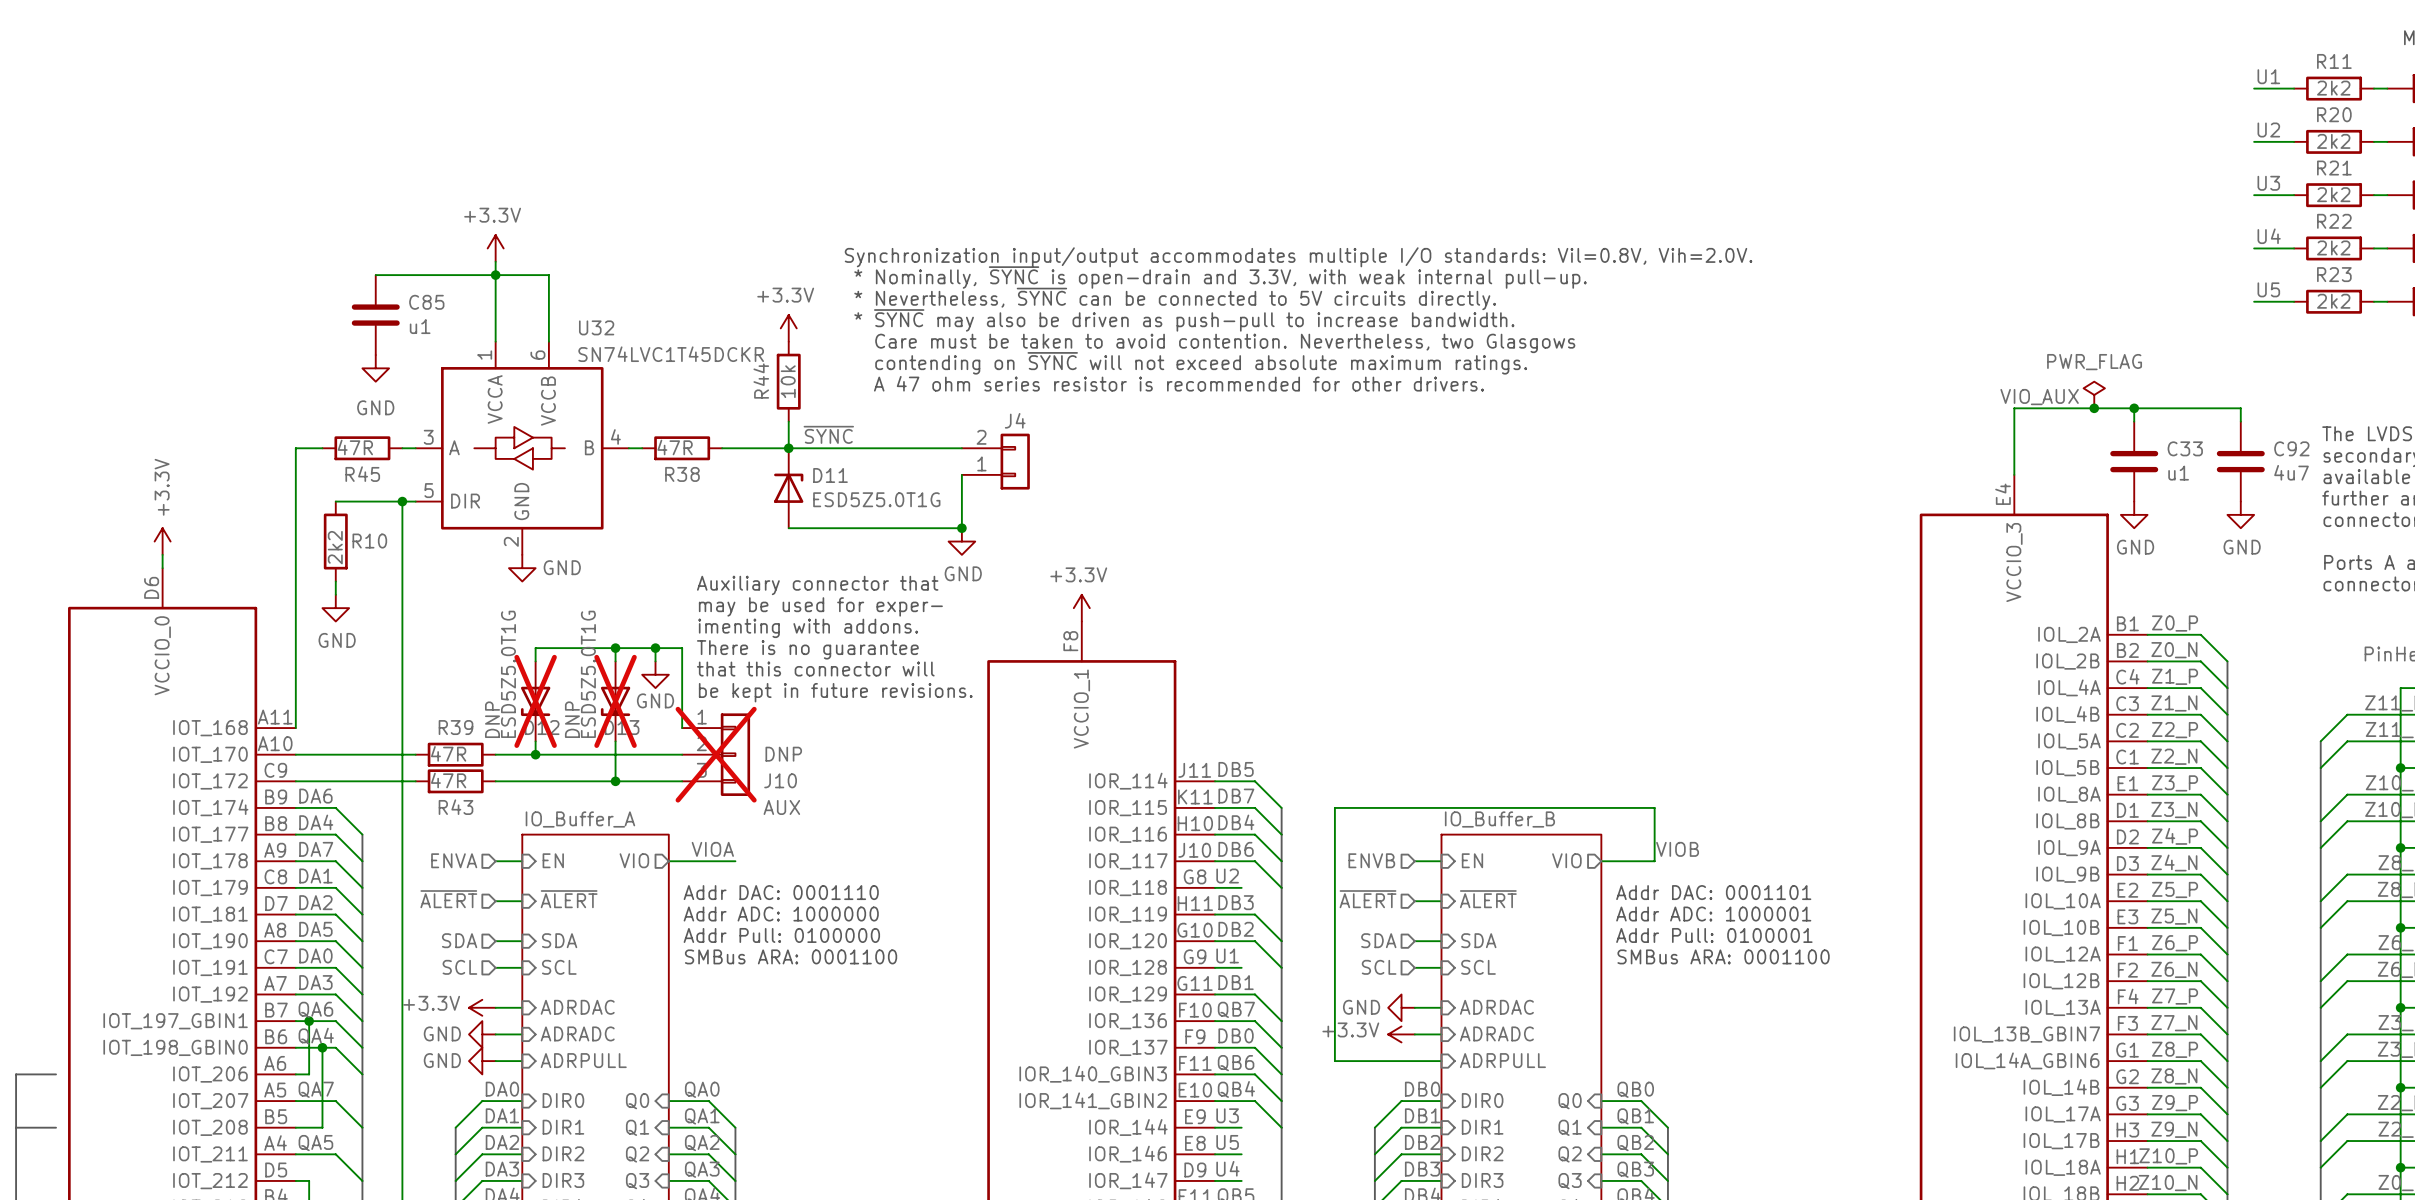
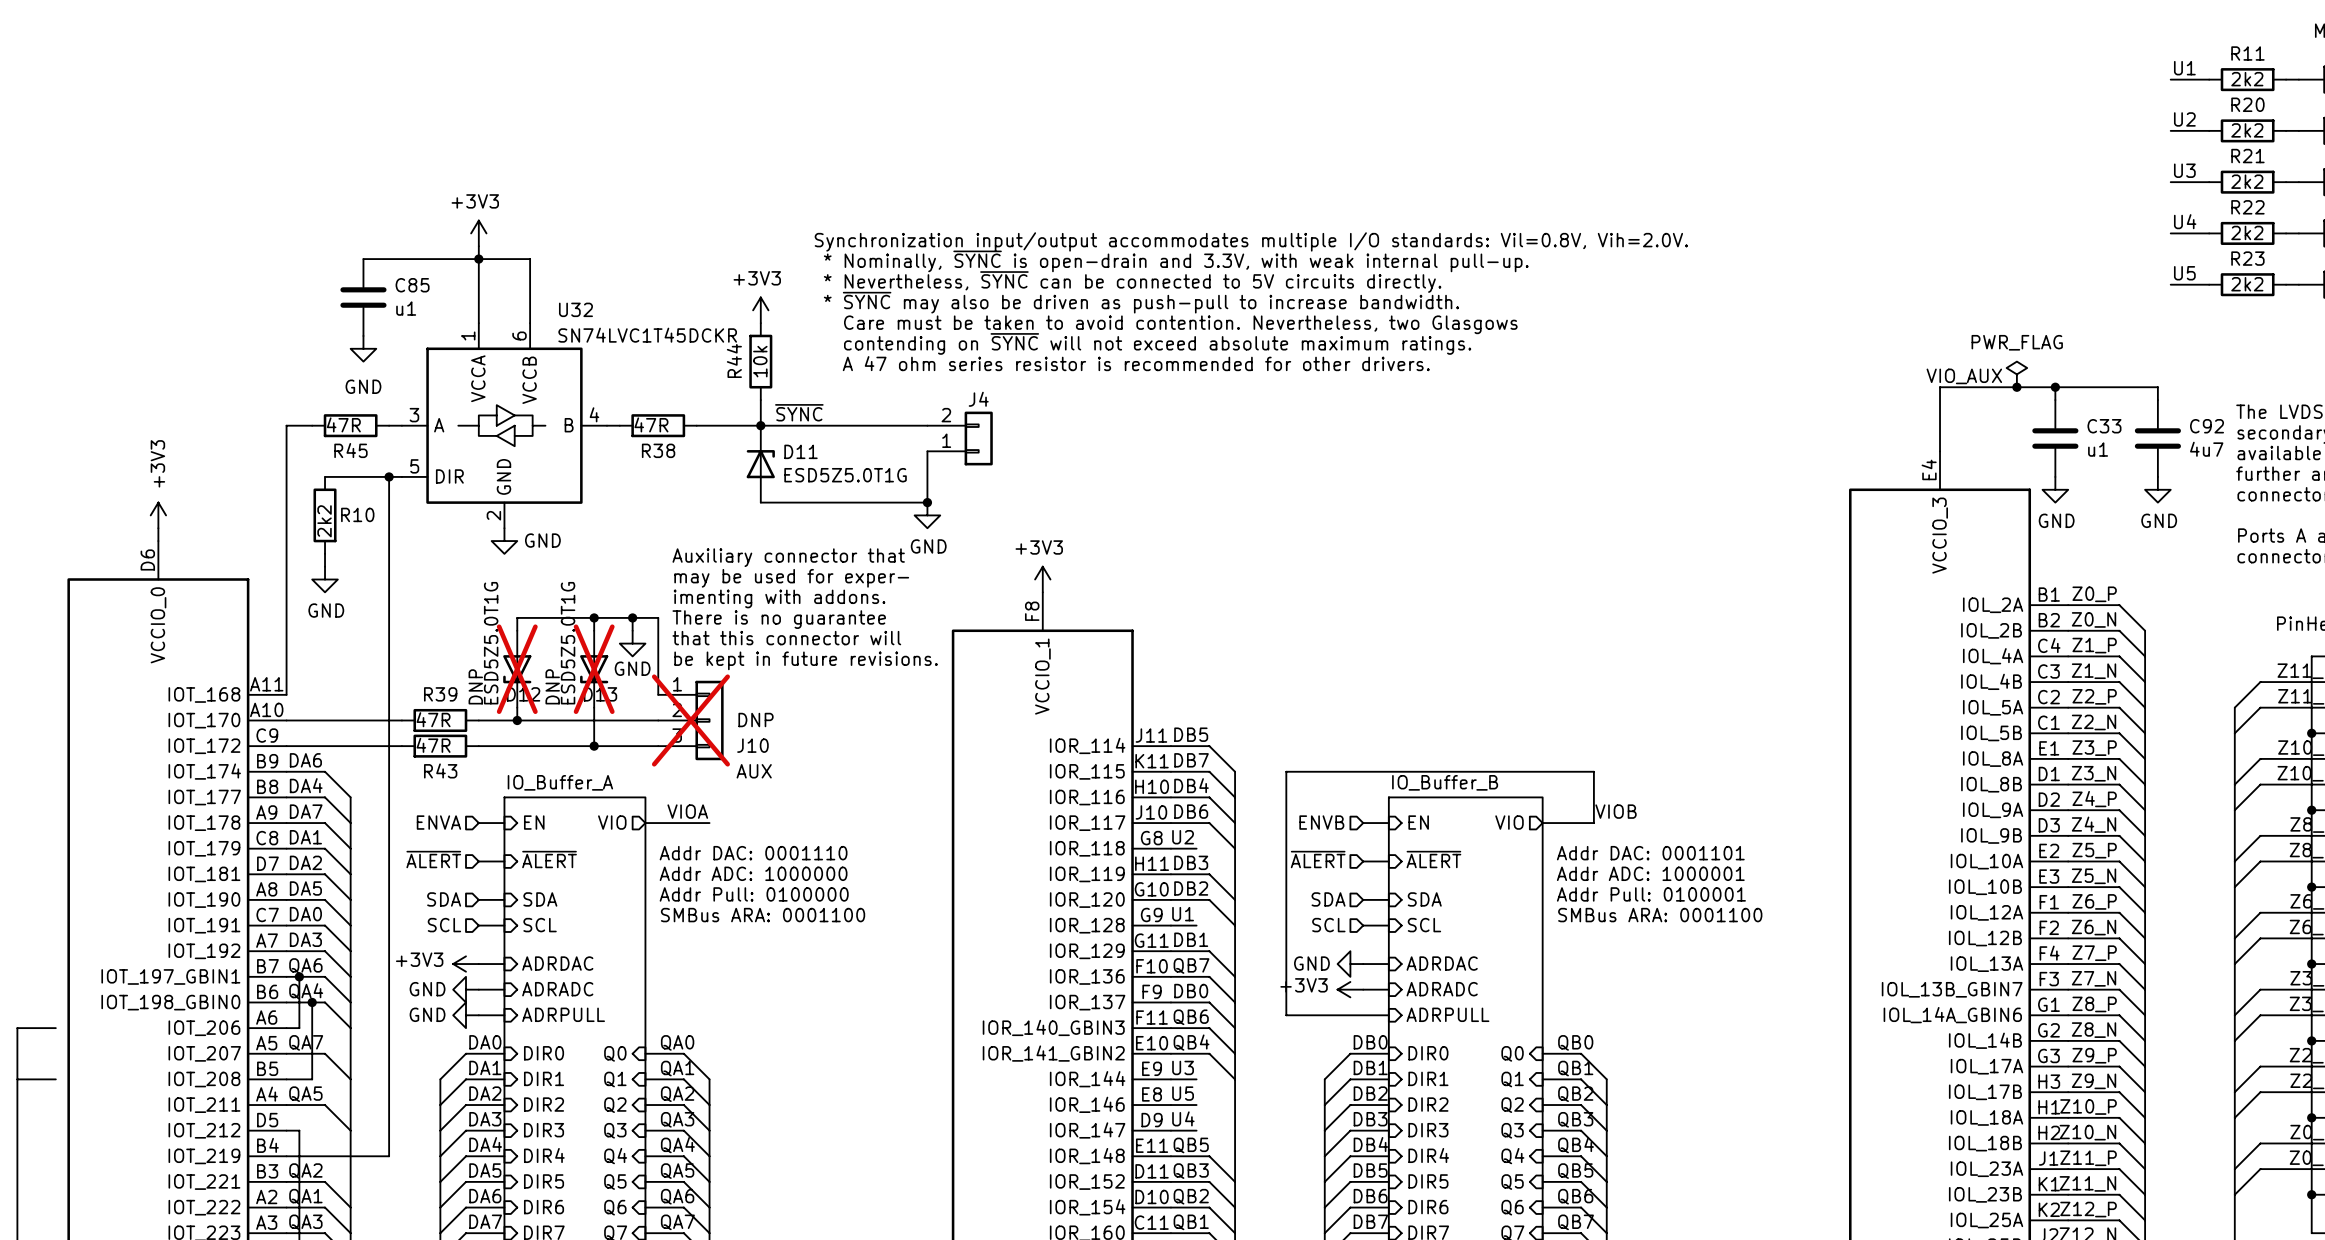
power symbol: +3.3V (495, 248) -> +3V3 (478, 233)
power symbol: +3.3V (788, 328) -> +3V3 (760, 310)
power symbol: +3.3V (162, 541) -> +3V3 (158, 515)
power symbol: +3.3V (1081, 608) -> +3V3 (1042, 579)
power symbol: +3.3V (482, 1007) -> +3V3 (466, 964)
power symbol: +3.3V (1401, 1034) -> +3V3 (1350, 989)

